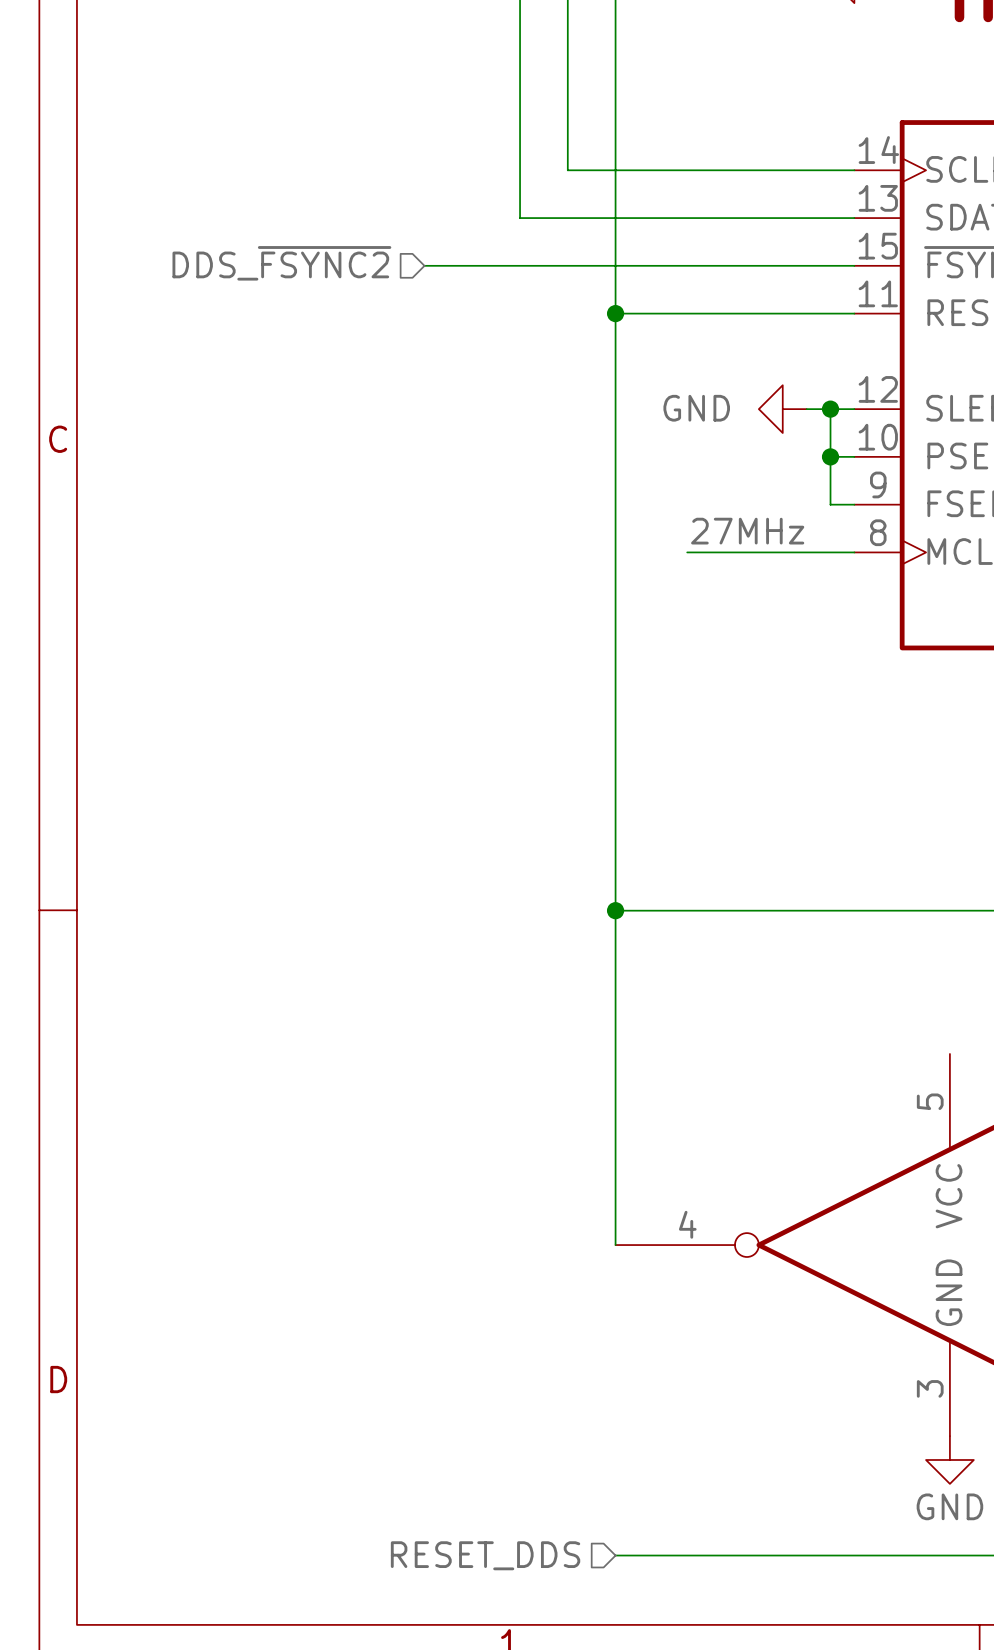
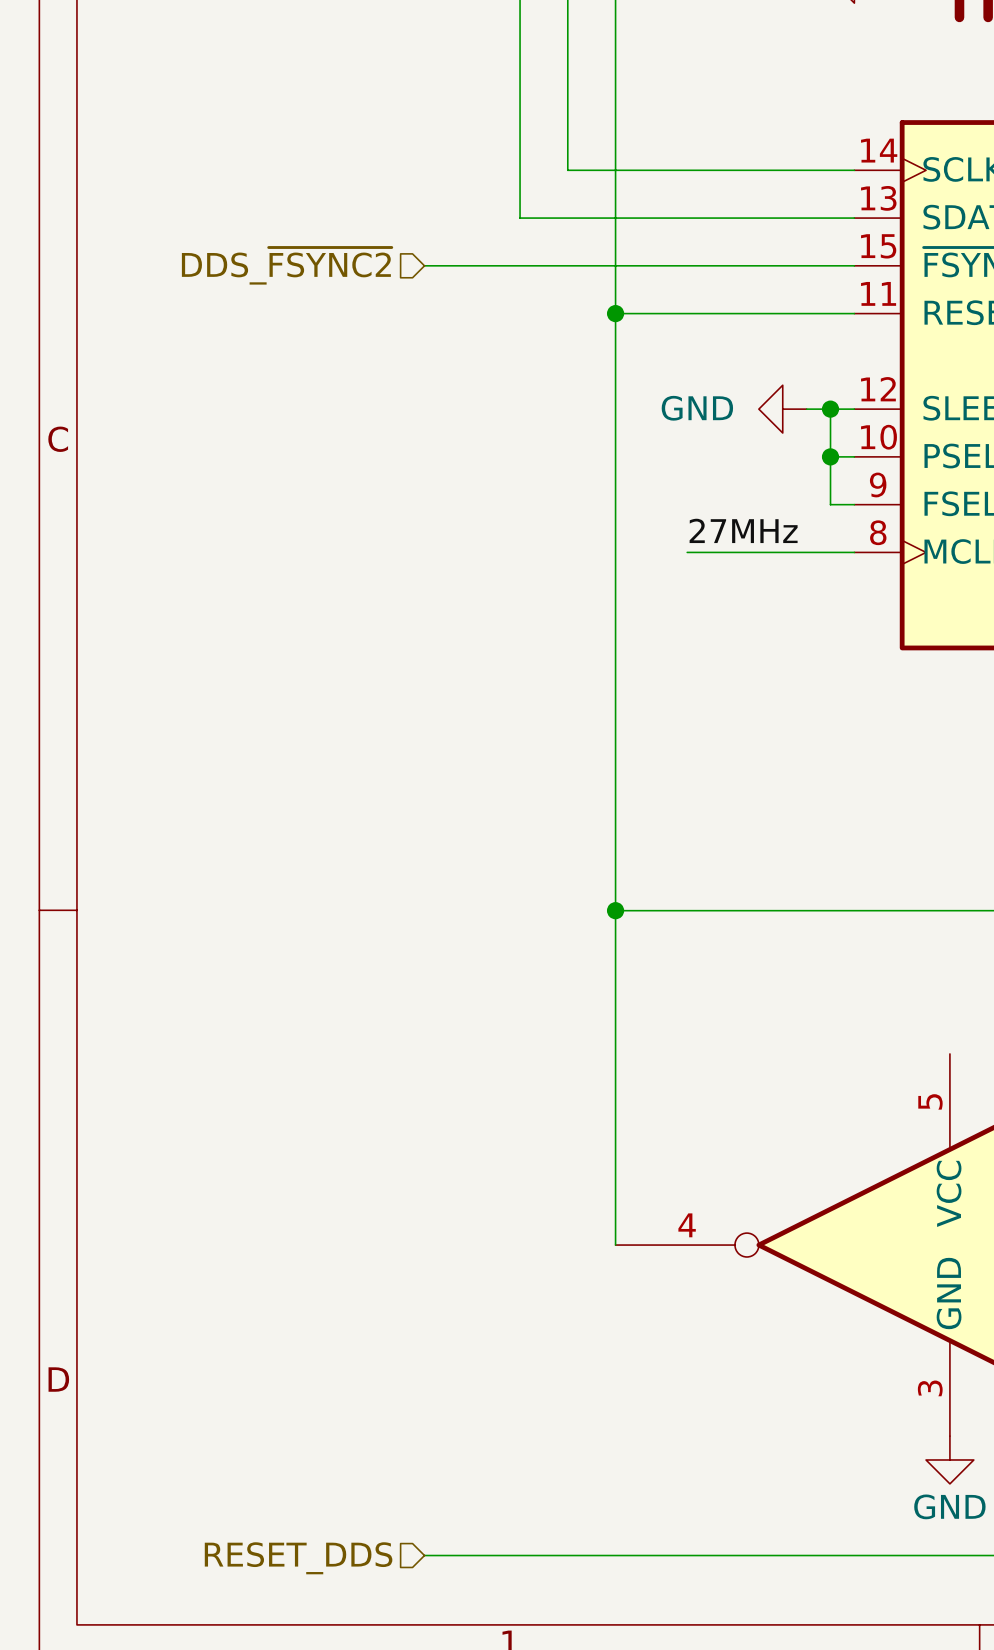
wire: none -> (424, 1555) (615, 1555)
hierarchical label position: RESET_DDS (485, 1555) -> RESET_DDS (298, 1558)

